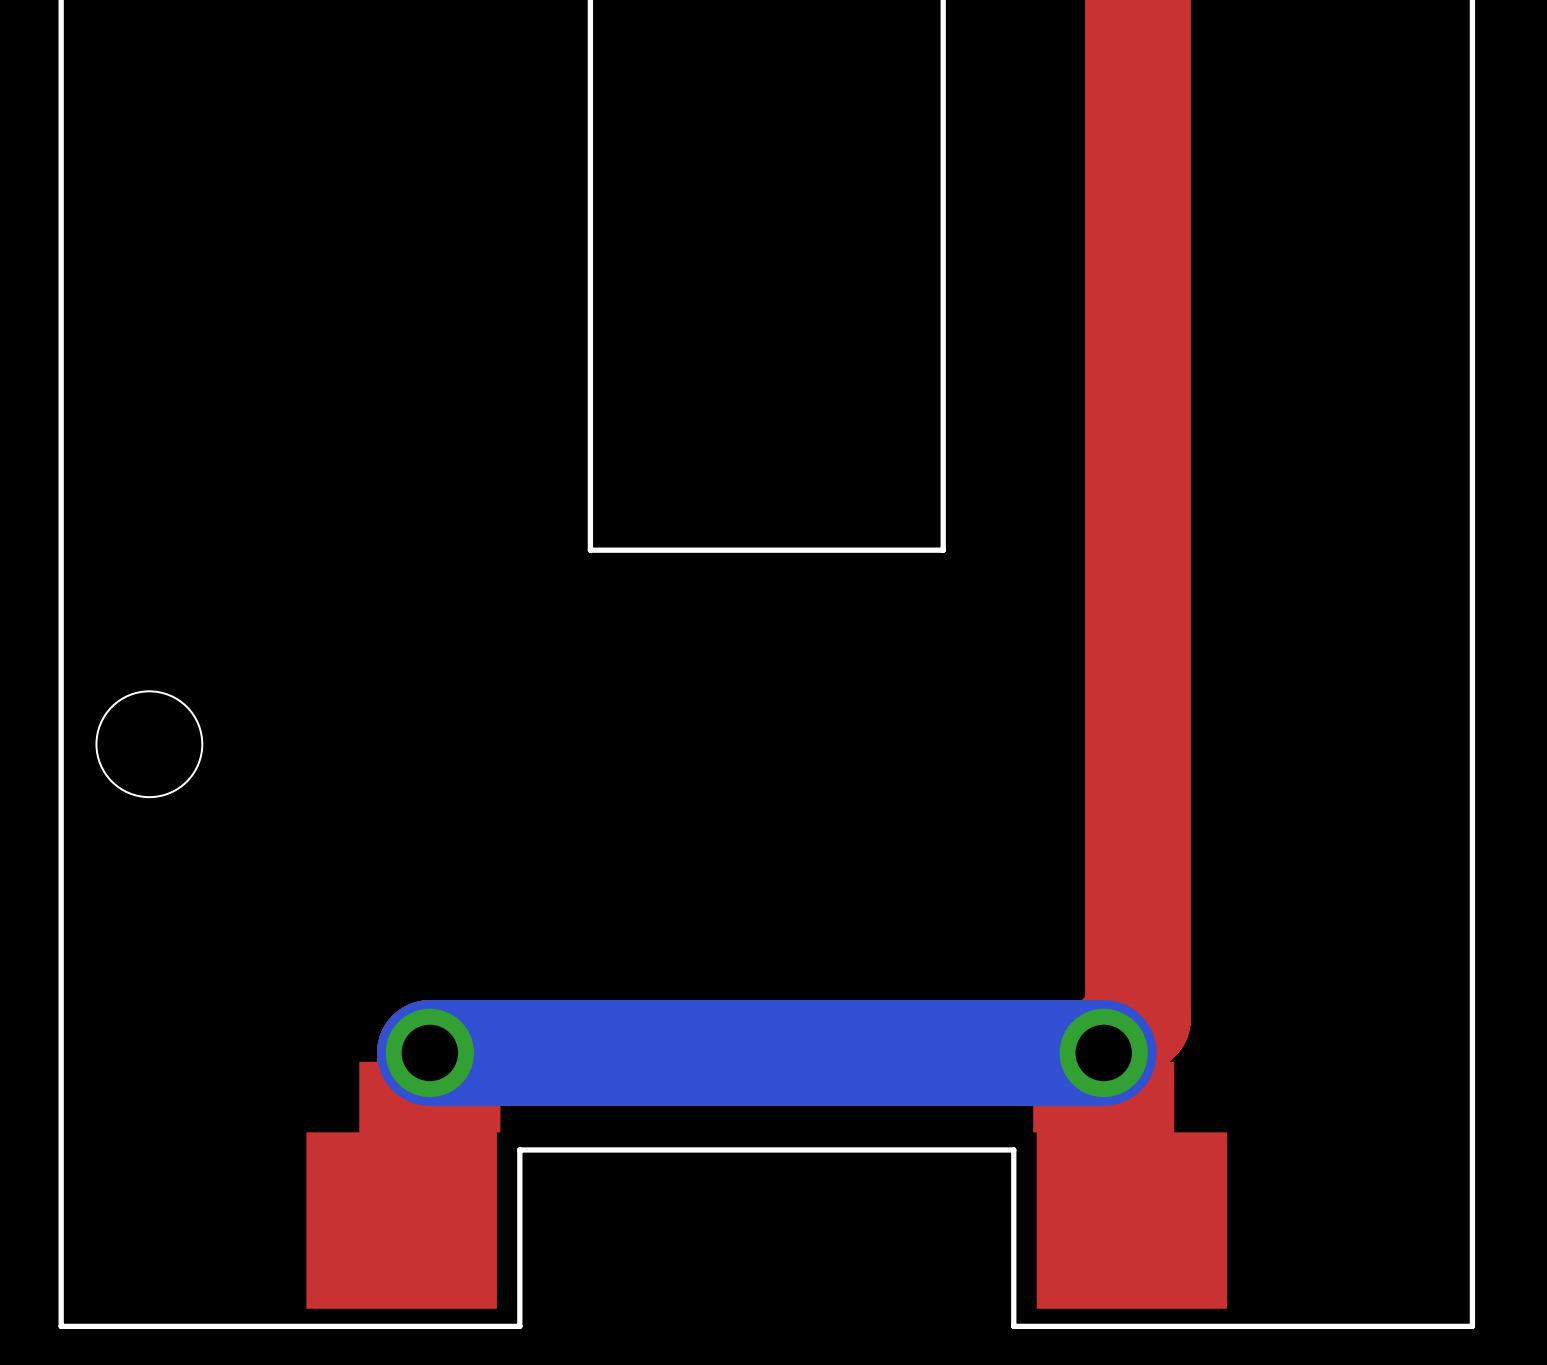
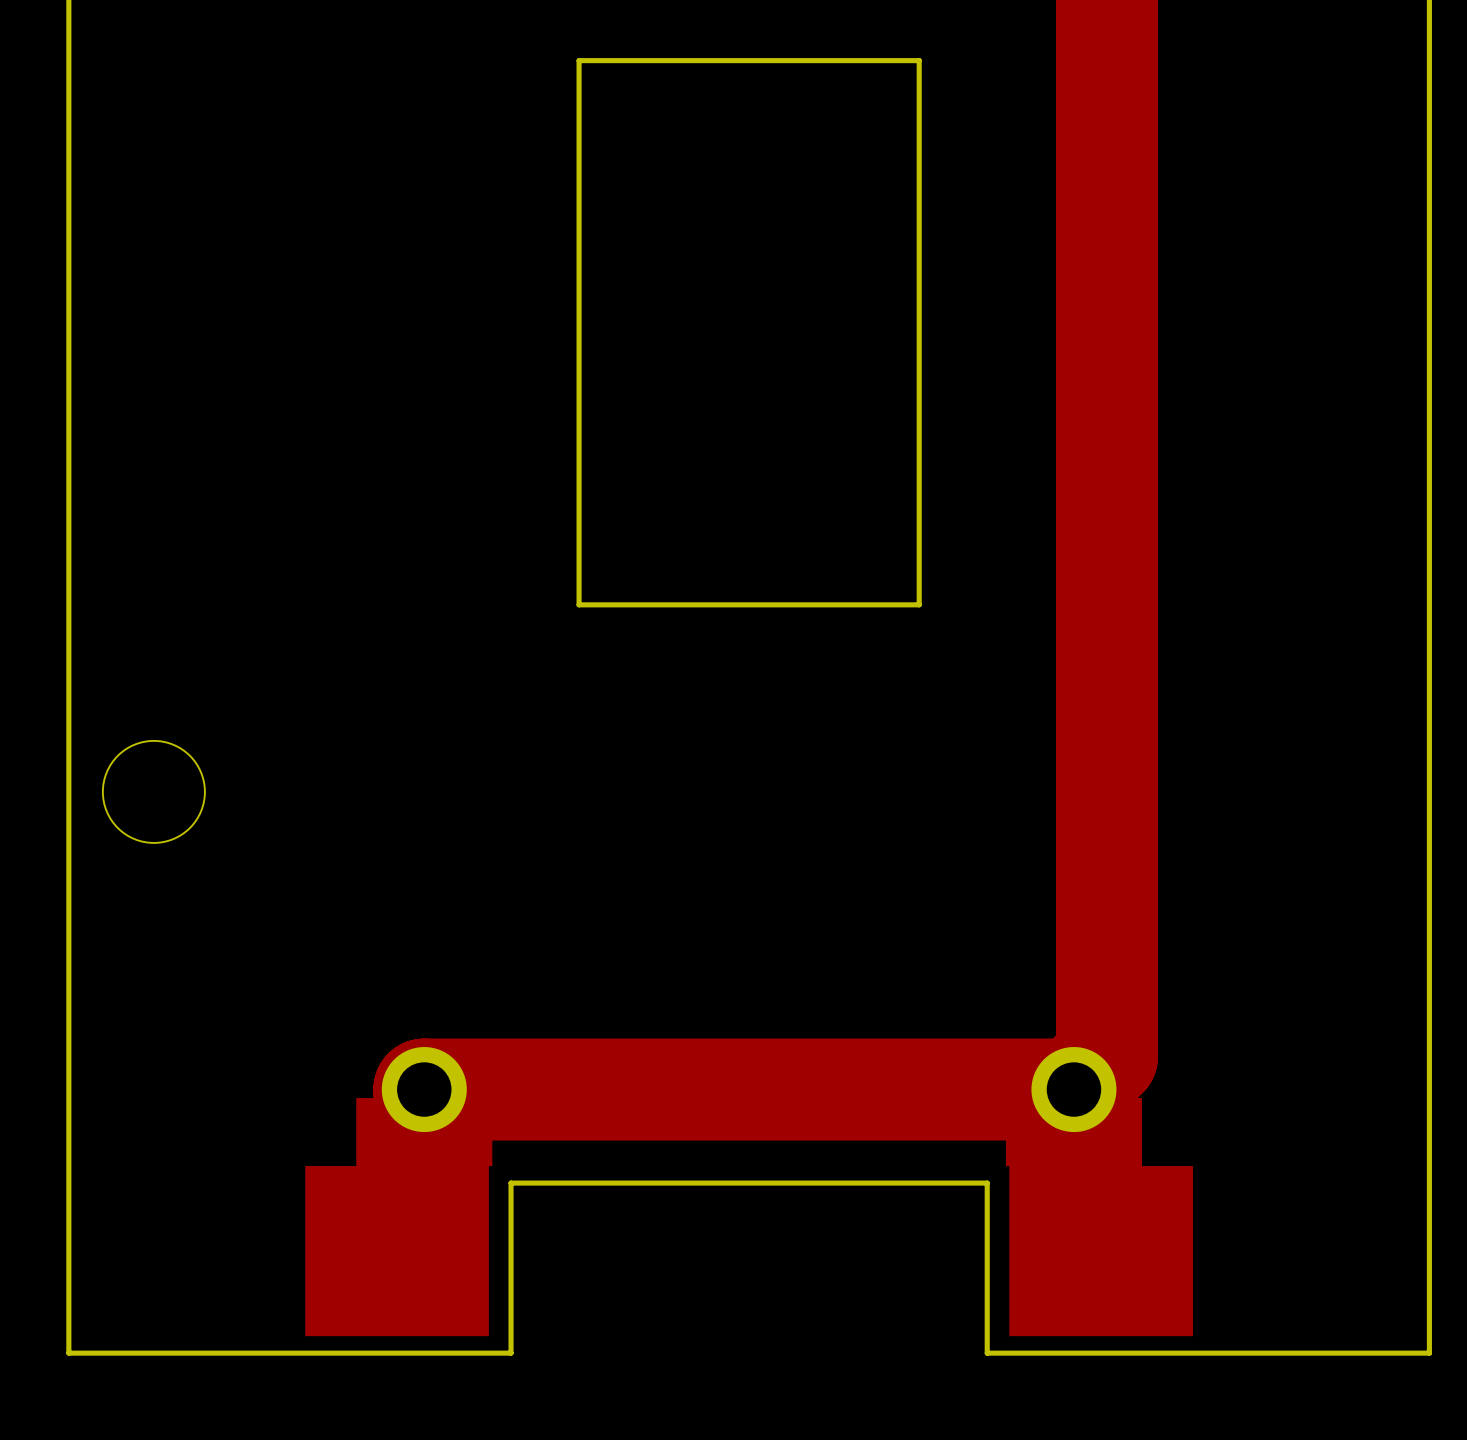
bottom track: (1103, 1052) (429, 1052) -> none

